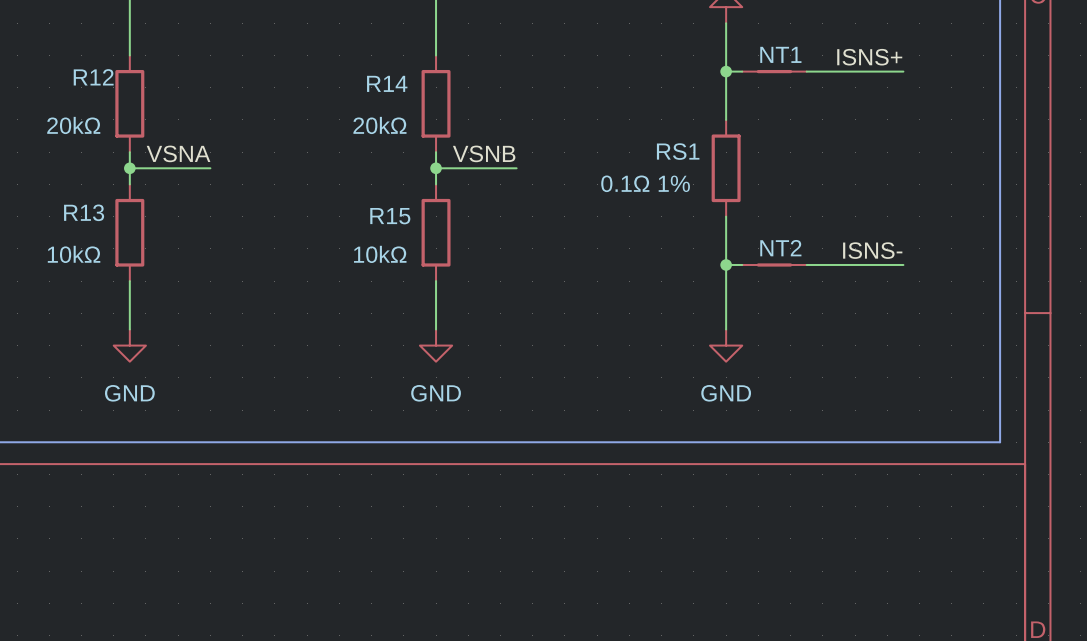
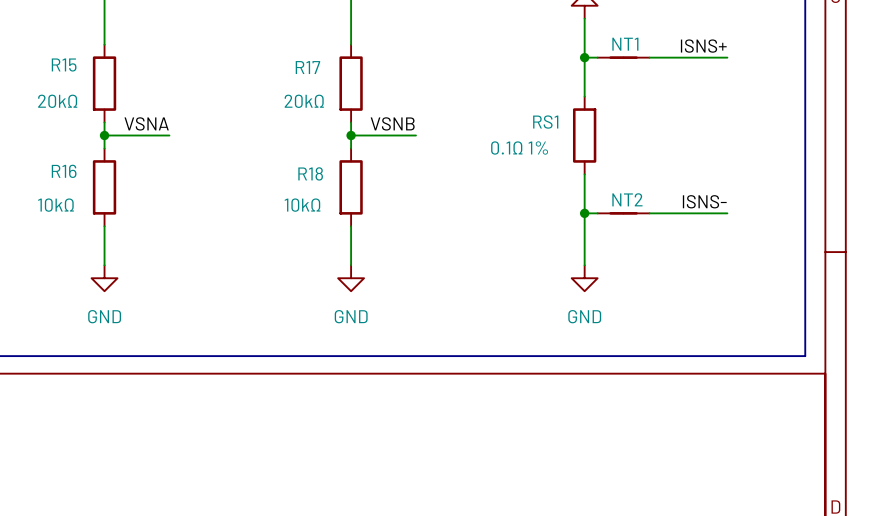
R12 name: R12 (93, 77) -> R15 (64, 65)
R14 name: R14 (387, 83) -> R17 (307, 67)
R13 name: R13 (84, 212) -> R16 (64, 171)
R15 name: R15 (390, 216) -> R18 (310, 173)

